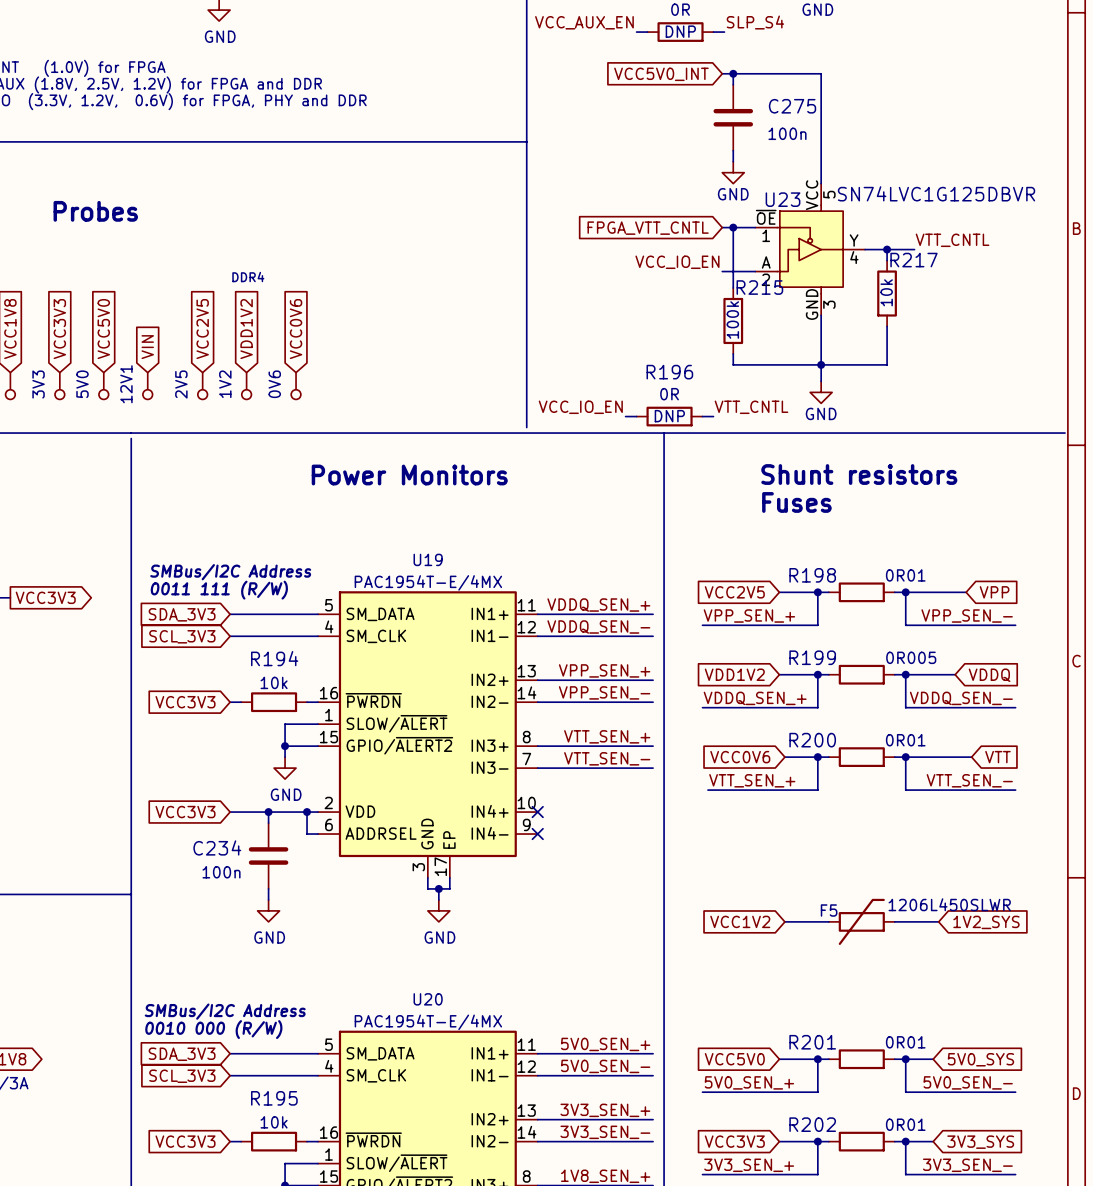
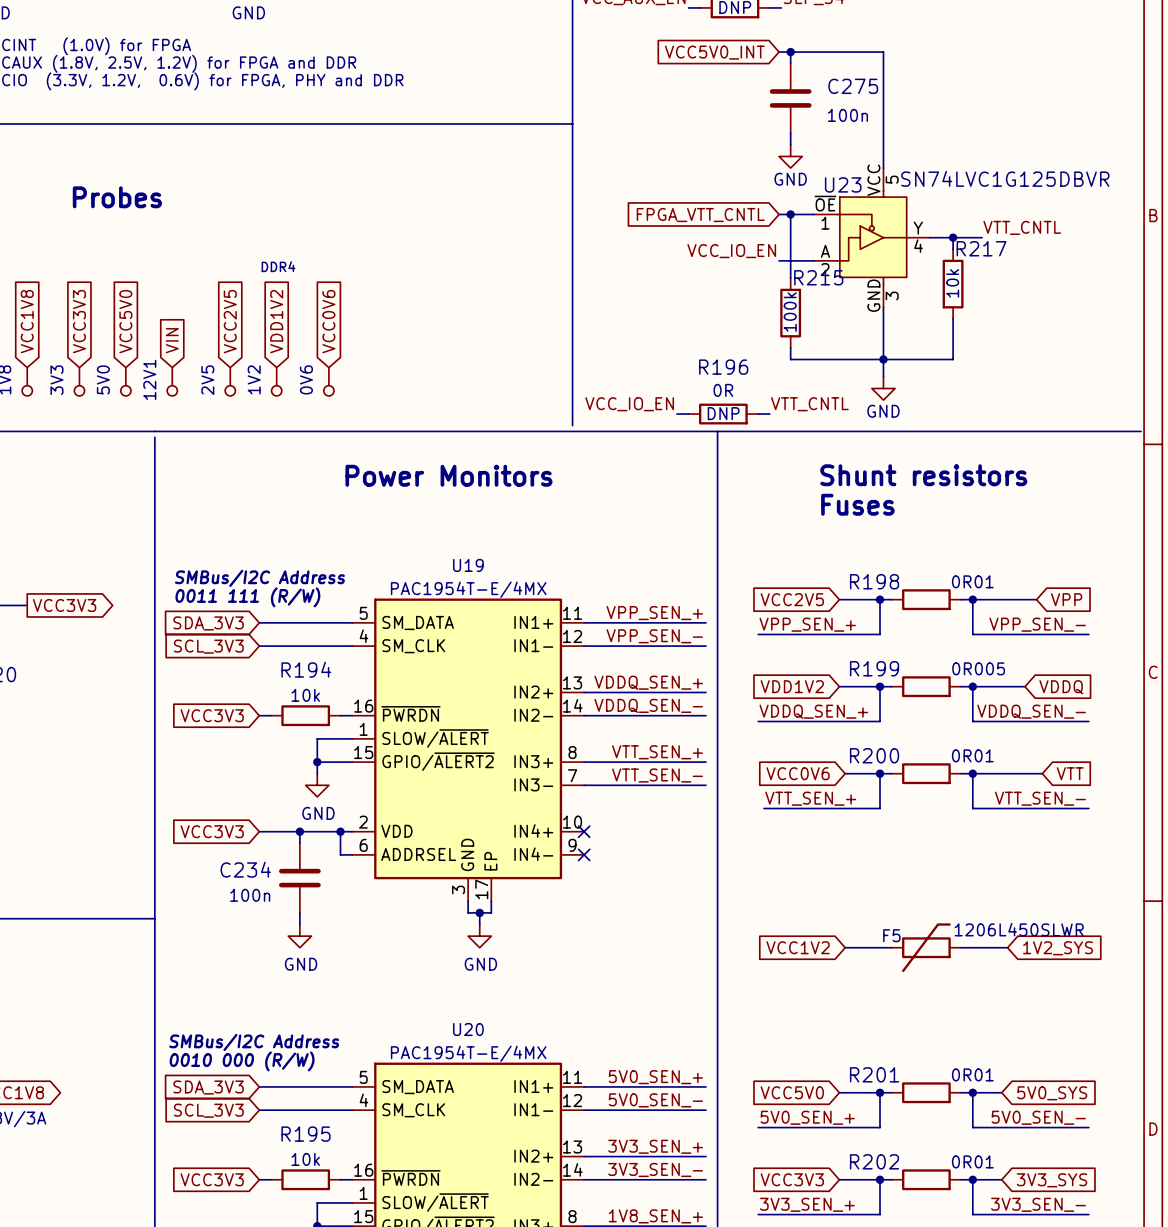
label: VDDQ_SEN_+ (598, 605) -> VPP_SEN_+ (654, 613)
label: VDDQ_SEN_- (598, 626) -> VPP_SEN_- (654, 636)
label: VPP_SEN_+ (604, 670) -> VDDQ_SEN_+ (648, 682)
label: VPP_SEN_- (604, 692) -> VDDQ_SEN_- (648, 705)

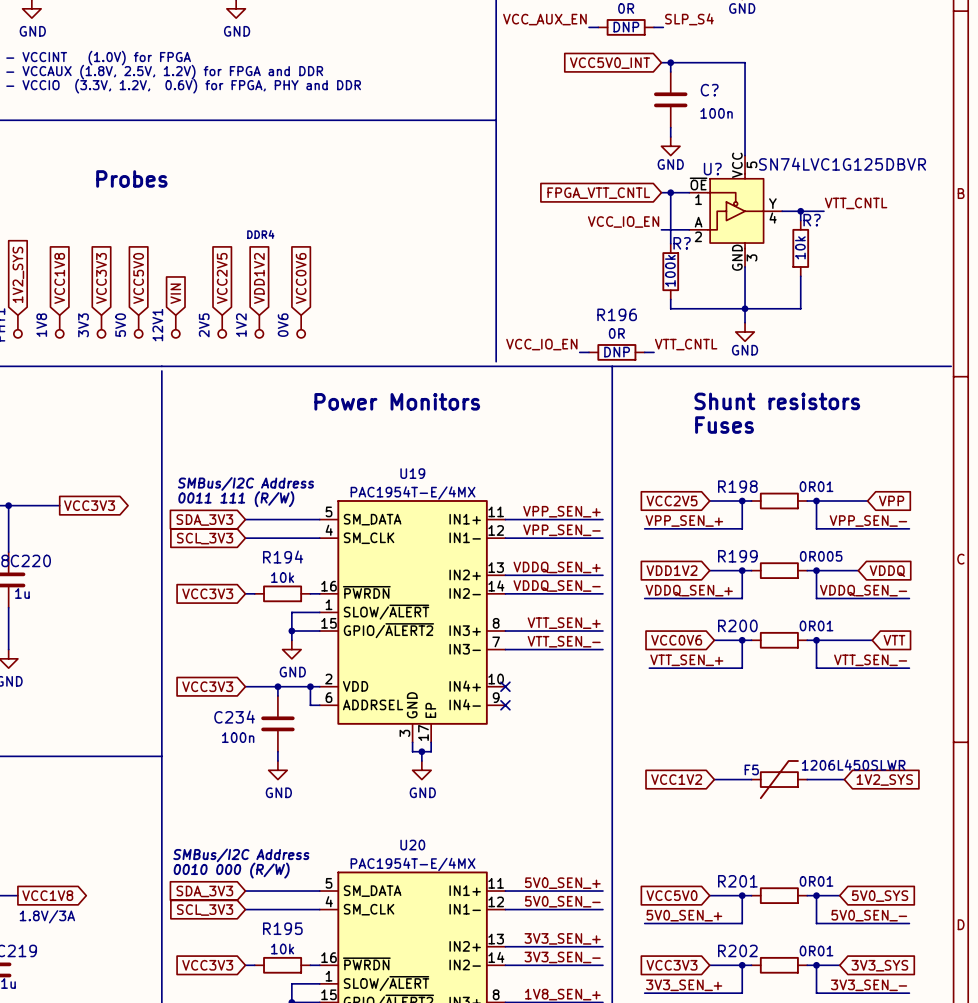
C275 name: C275 (853, 86) -> C? (709, 90)
U23 name: U23 (843, 184) -> U? (712, 169)
R217 name: R217 (981, 248) -> R? (812, 220)
R215 name: R215 (818, 277) -> R? (682, 243)

